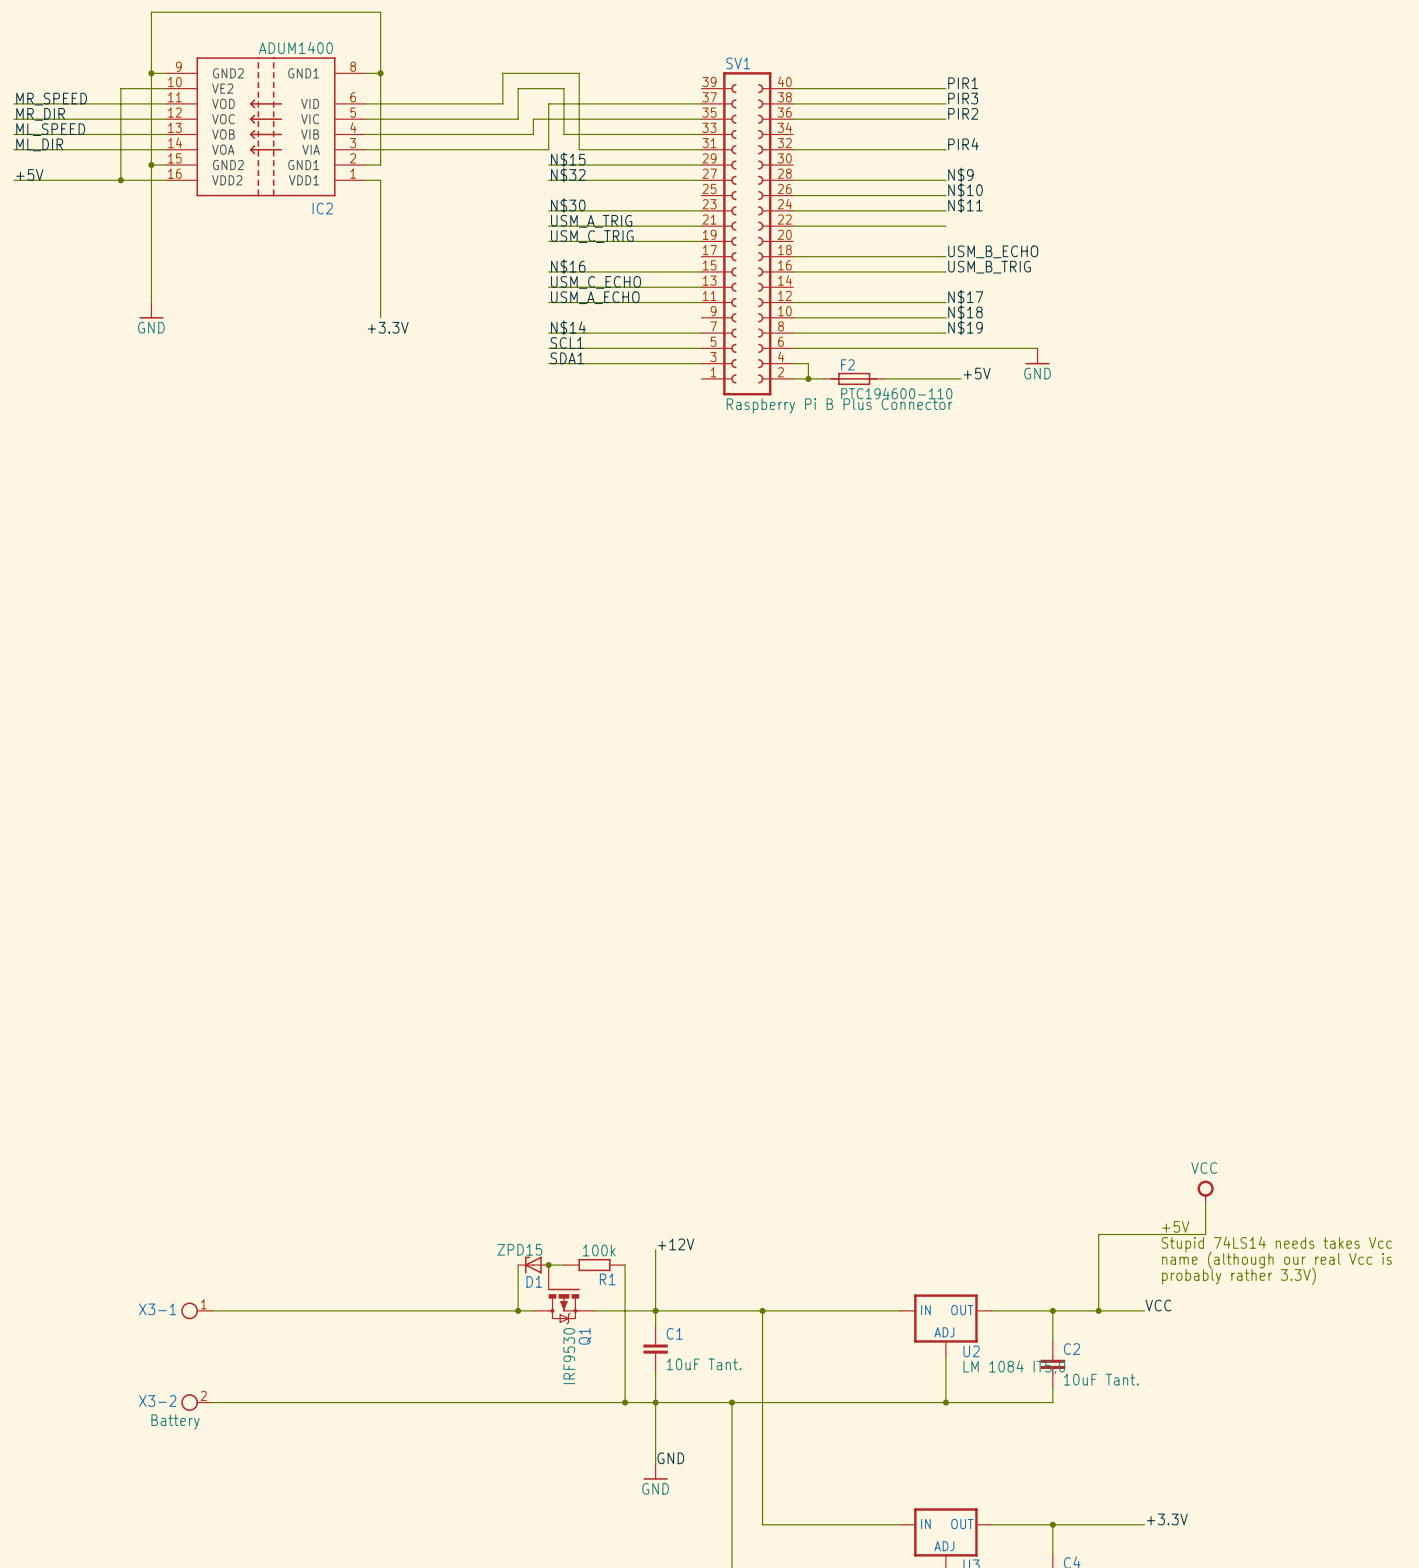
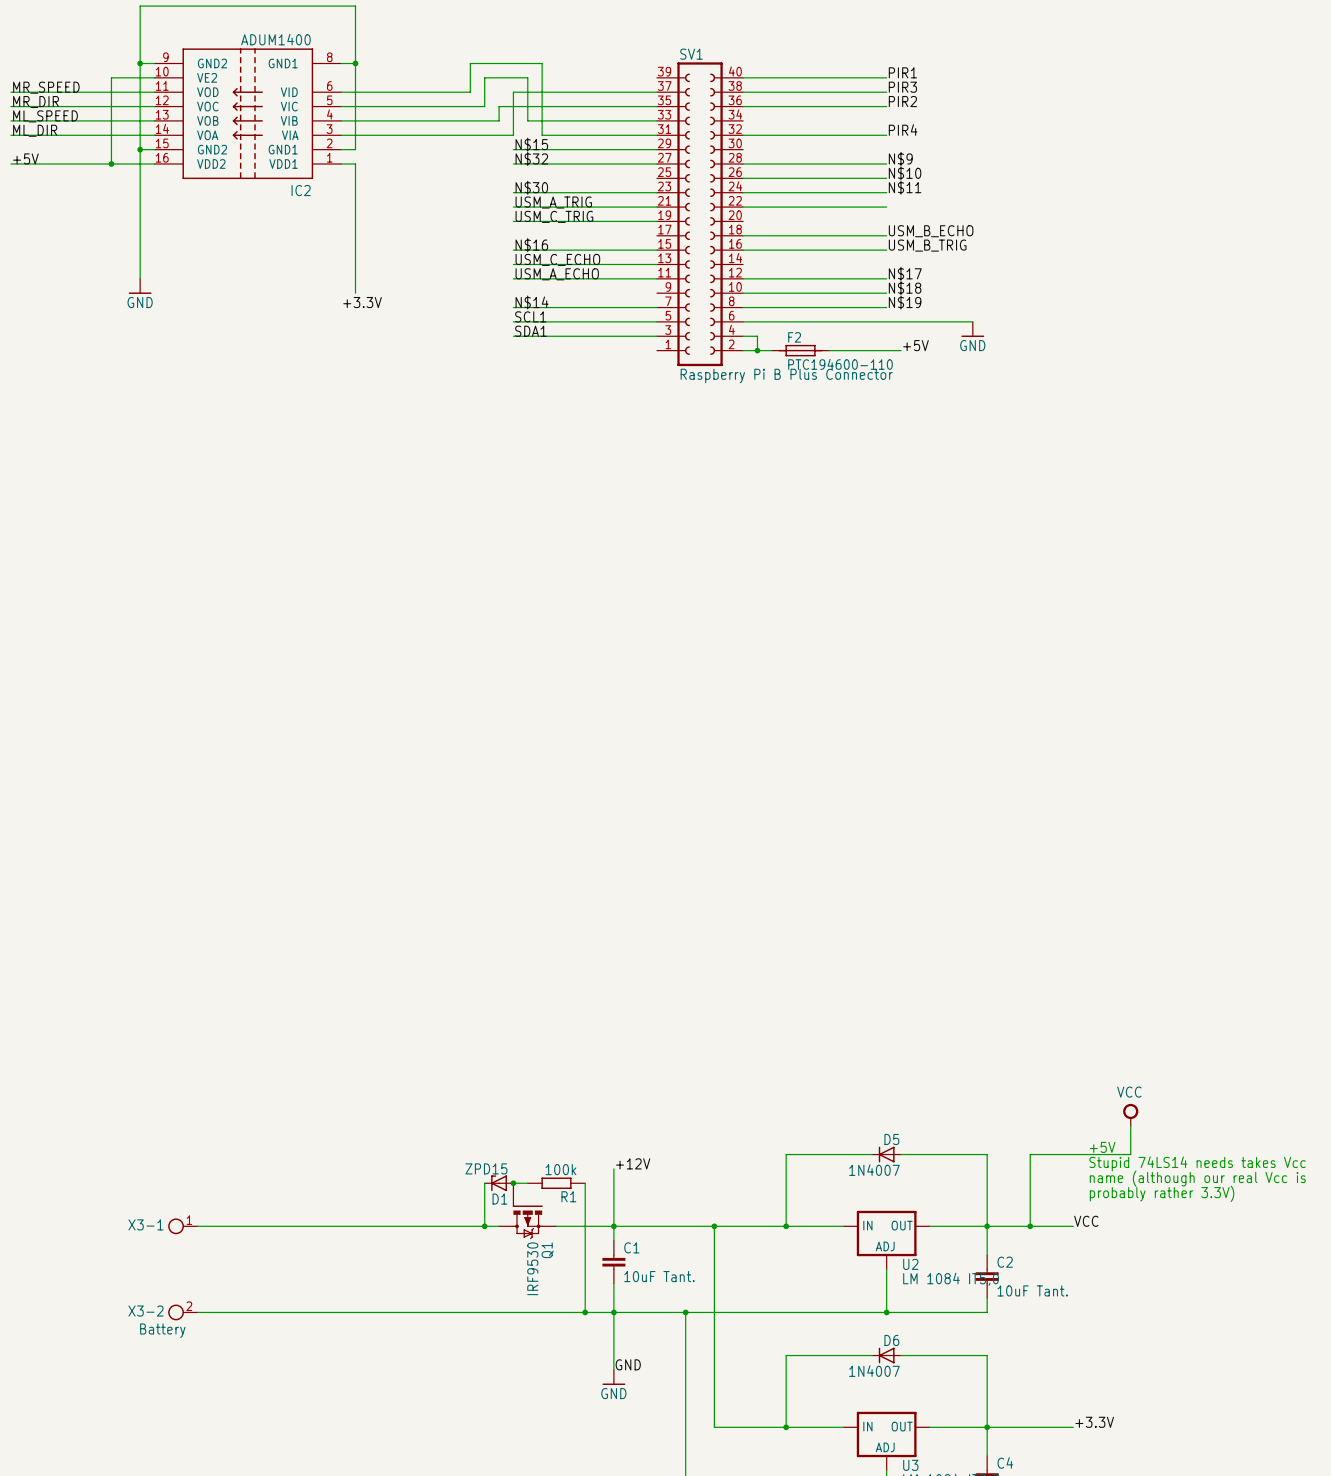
wire: none -> (872, 1154) (786, 1154) (786, 1226)
D5: none -> 1N4007 (886, 1154)
wire: none -> (901, 1154) (987, 1154) (987, 1226)
junction: none -> (786, 1226)
wire: none -> (872, 1355) (786, 1355) (786, 1427)
D6: none -> 1N4007 (886, 1355)
wire: none -> (901, 1355) (987, 1355) (987, 1427)
junction: none -> (786, 1427)

